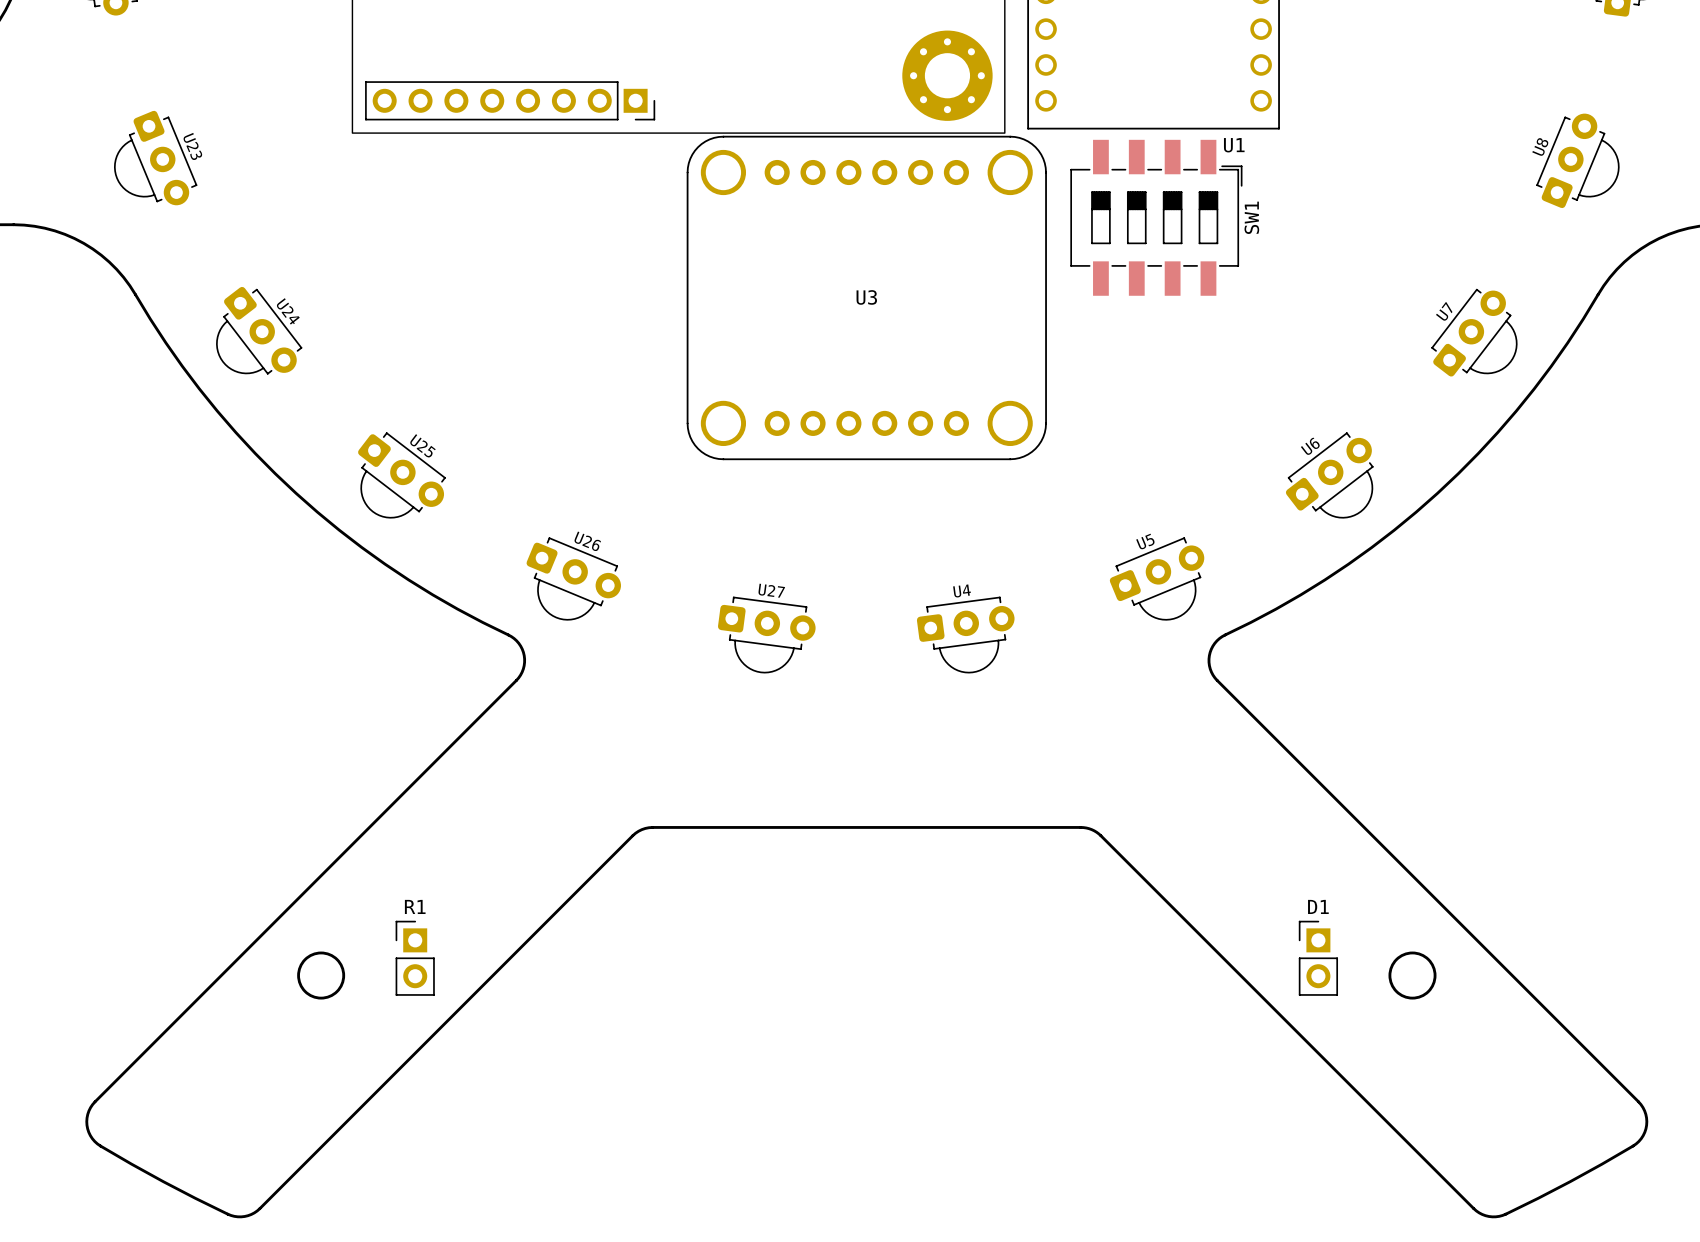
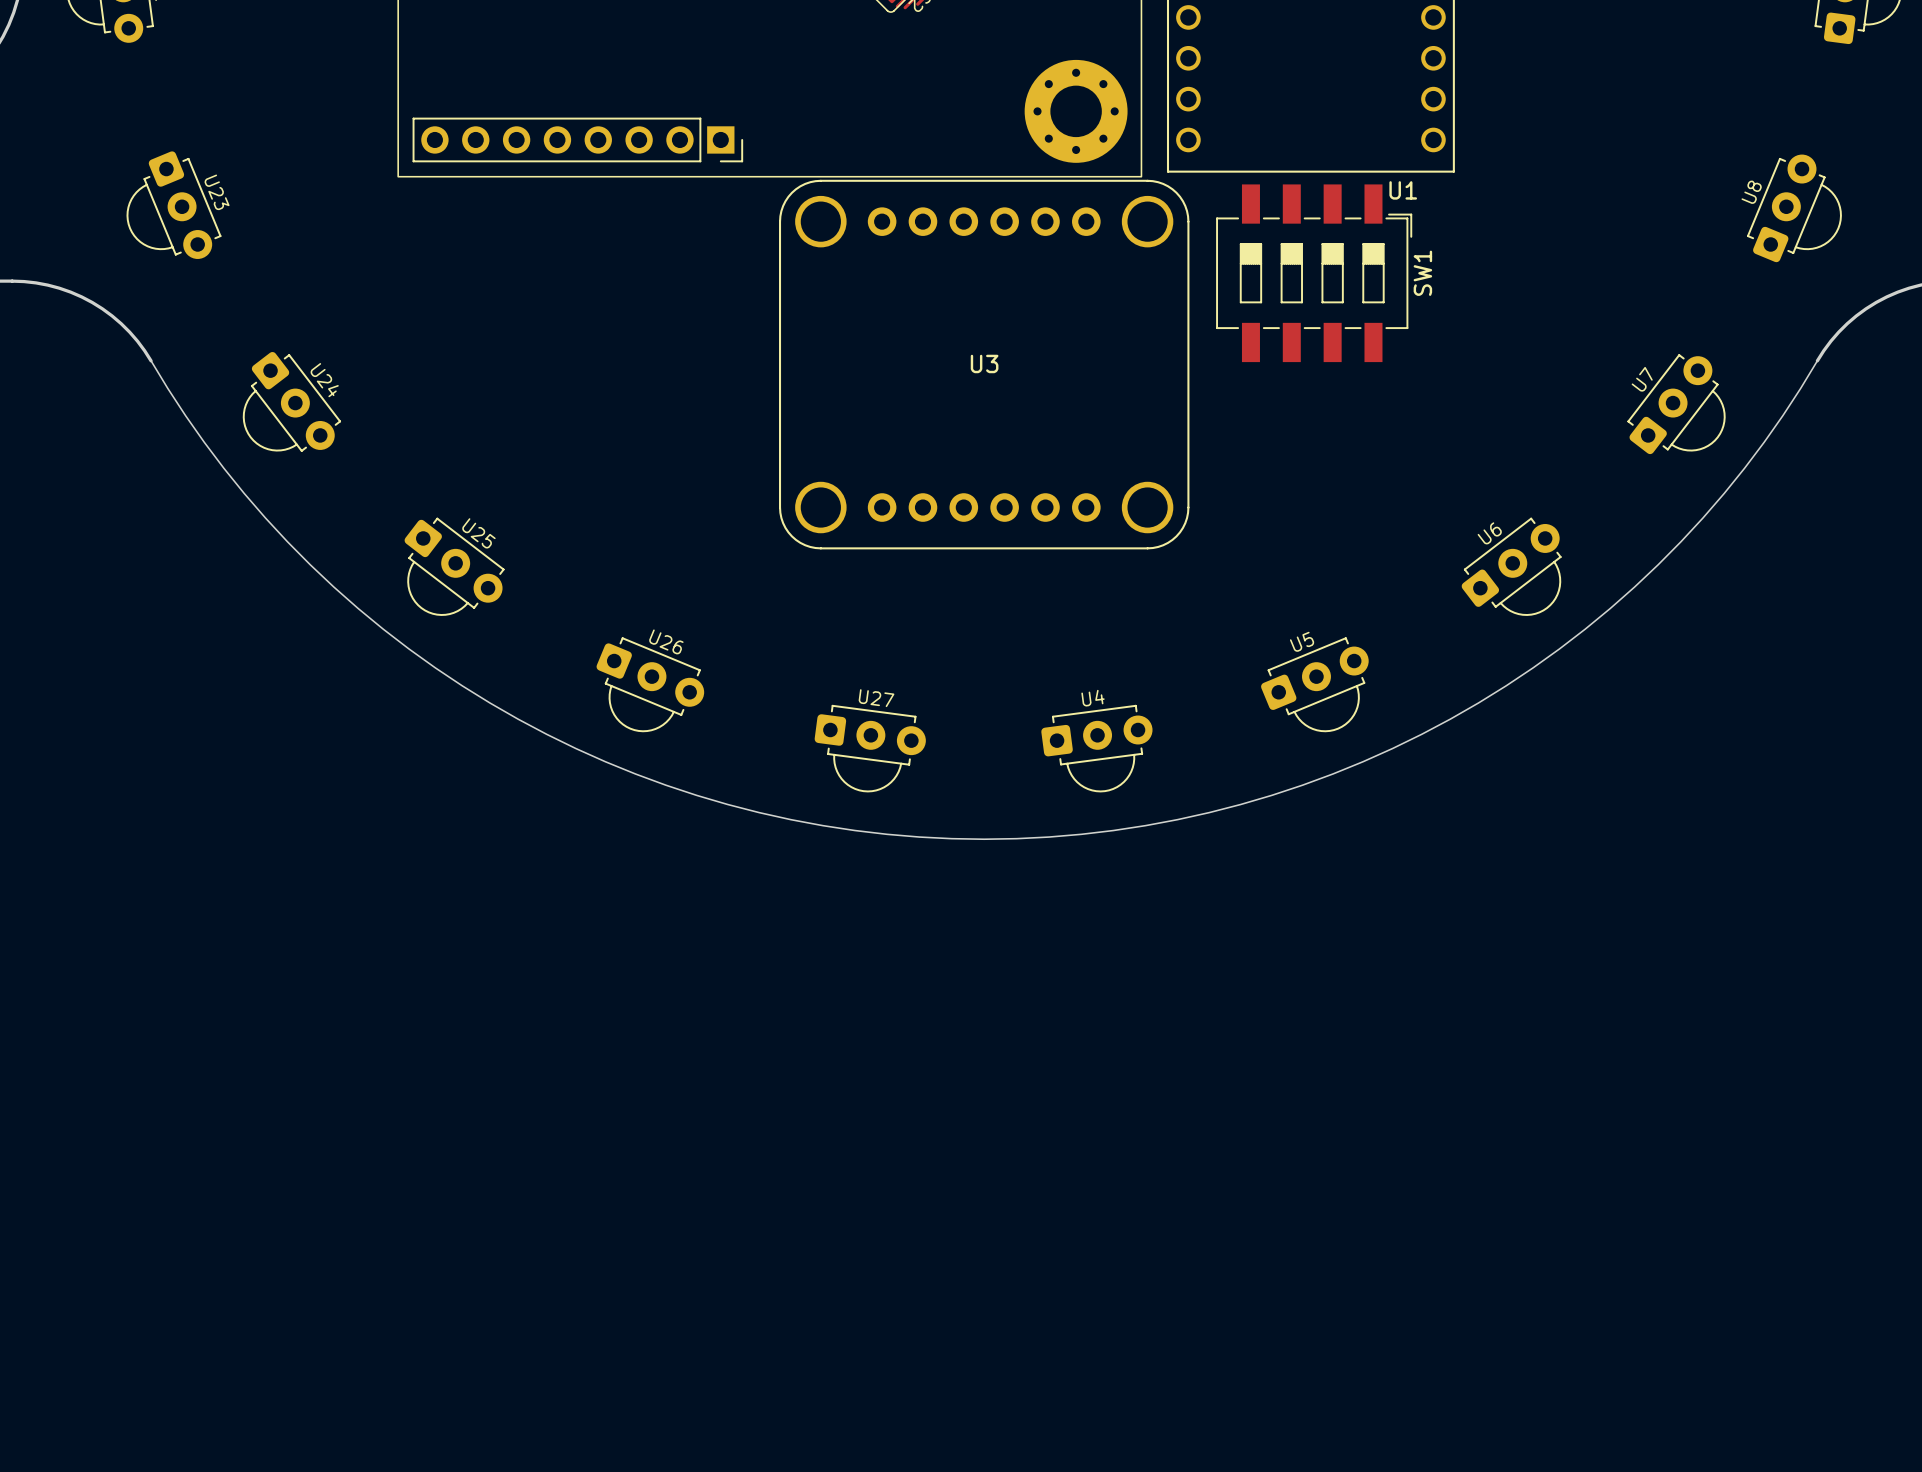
board edge: (135, 294) (165, 342) (199, 388) (255, 453) (296, 493) (361, 547) (408, 579) (457, 609) (514, 638) (522, 649) (524, 659) (522, 672) (516, 680) (90, 1107) (87, 1117) (87, 1128) (97, 1143) (195, 1198) (227, 1214) (241, 1216) (251, 1214) (259, 1208) (632, 835) (641, 829) (652, 827) (1089, 828) (1100, 835) (1479, 1212) (1492, 1216) (1505, 1214) (1570, 1181) (1633, 1146) (1641, 1138) (1645, 1128) (1645, 1114) (1640, 1104) (1217, 680) (1211, 672) (1209, 662) (1211, 649) (1219, 638) (1300, 594) (1348, 564) (1416, 512) (1458, 473) (1497, 432) (1534, 388) (1567, 342) (1598, 294) -> (151, 360) (185, 415) (223, 468) (265, 517) (310, 564) (358, 608) (408, 648) (462, 685) (517, 719) (605, 761) (665, 785) (727, 804) (790, 819) (854, 830) (919, 837) (984, 839) (1081, 834) (1145, 825) (1209, 812) (1271, 795) (1332, 773) (1392, 748) (1450, 719) (1506, 685) (1559, 648) (1610, 608) (1658, 564) (1703, 517) (1744, 468) (1782, 415) (1817, 360)
round board edge: [297, 951, 346, 1000] -> none
round board edge: [1388, 951, 1437, 1000] -> none
R1: (415, 958) -> none
D1: (1318, 958) -> none

